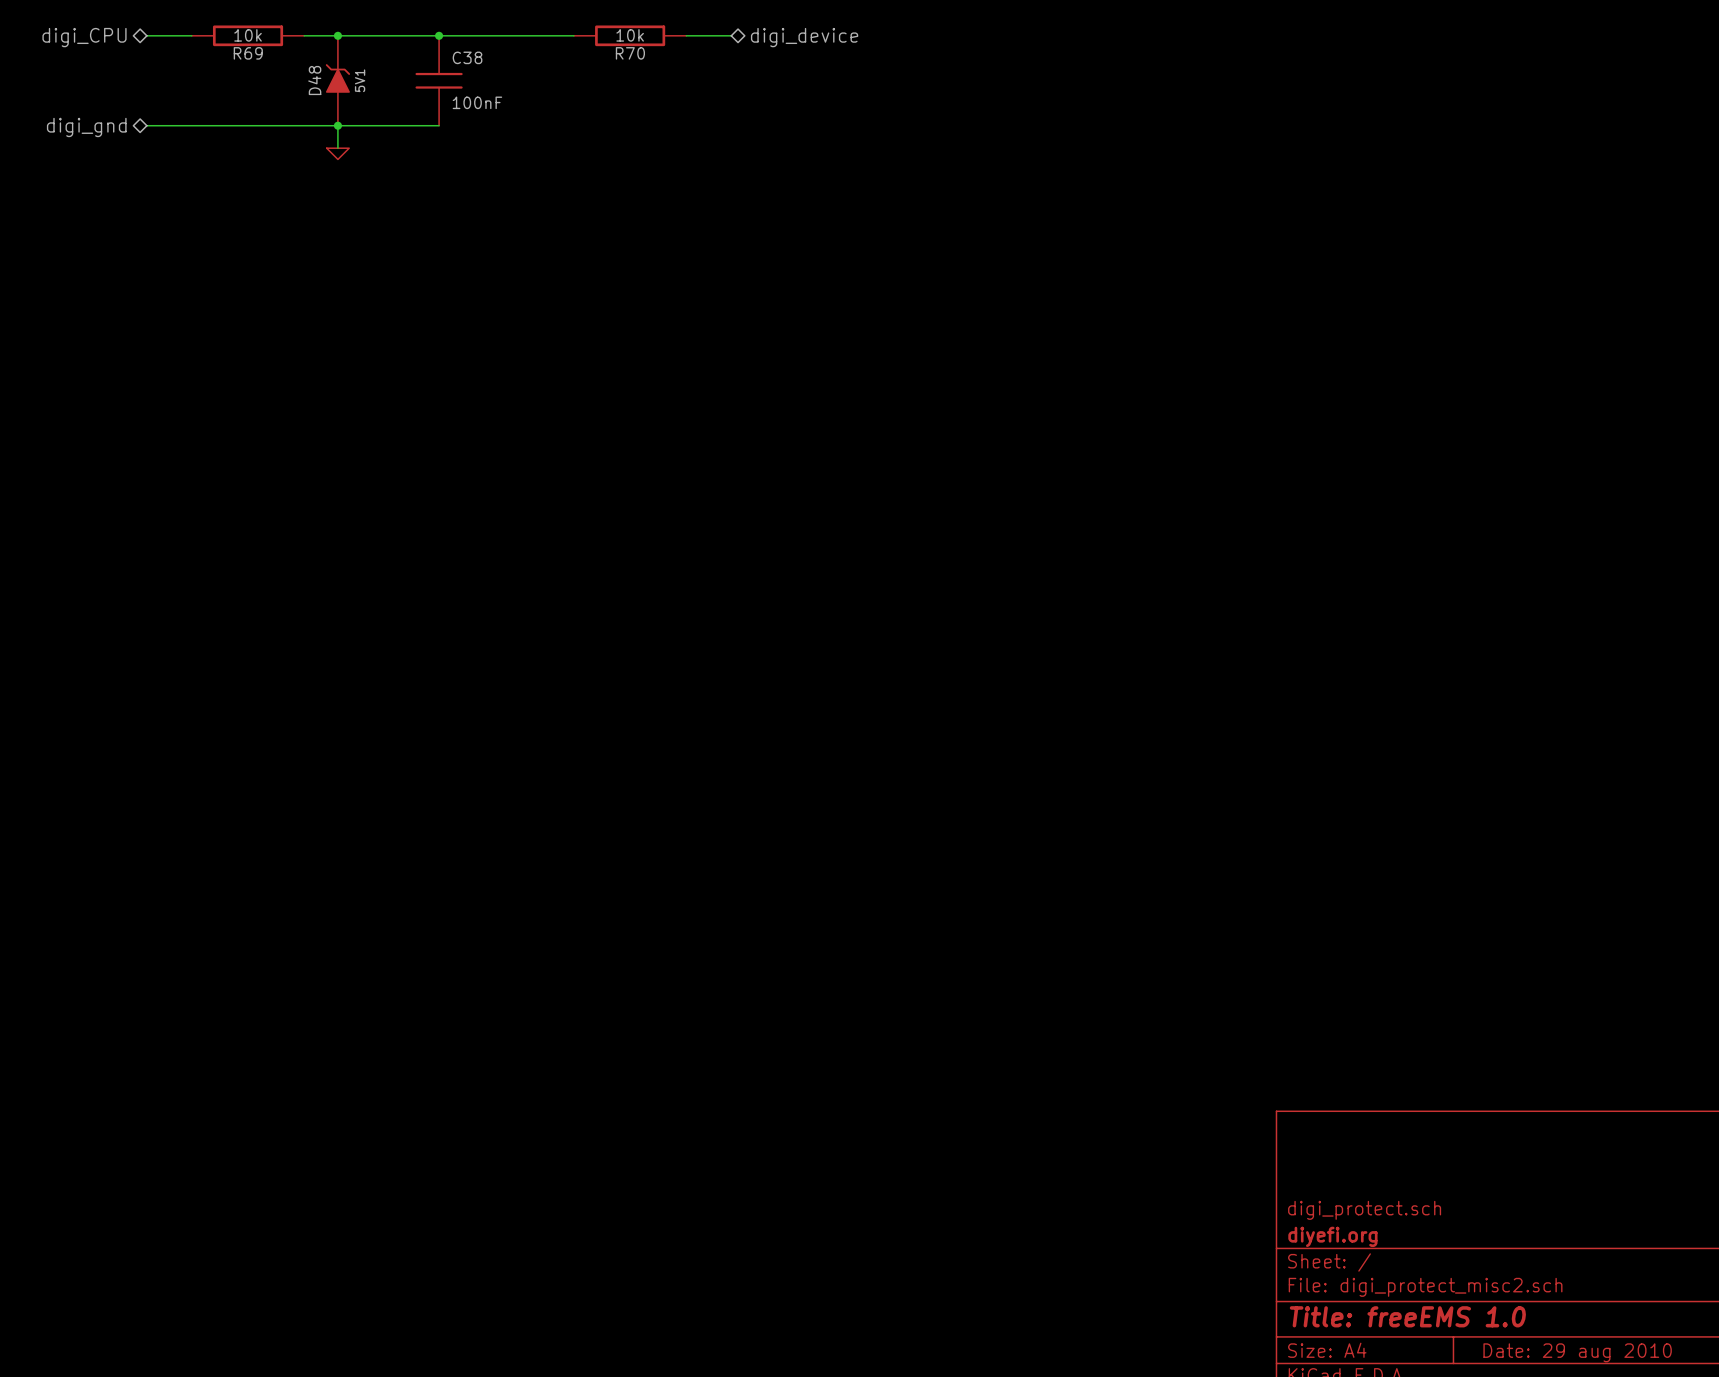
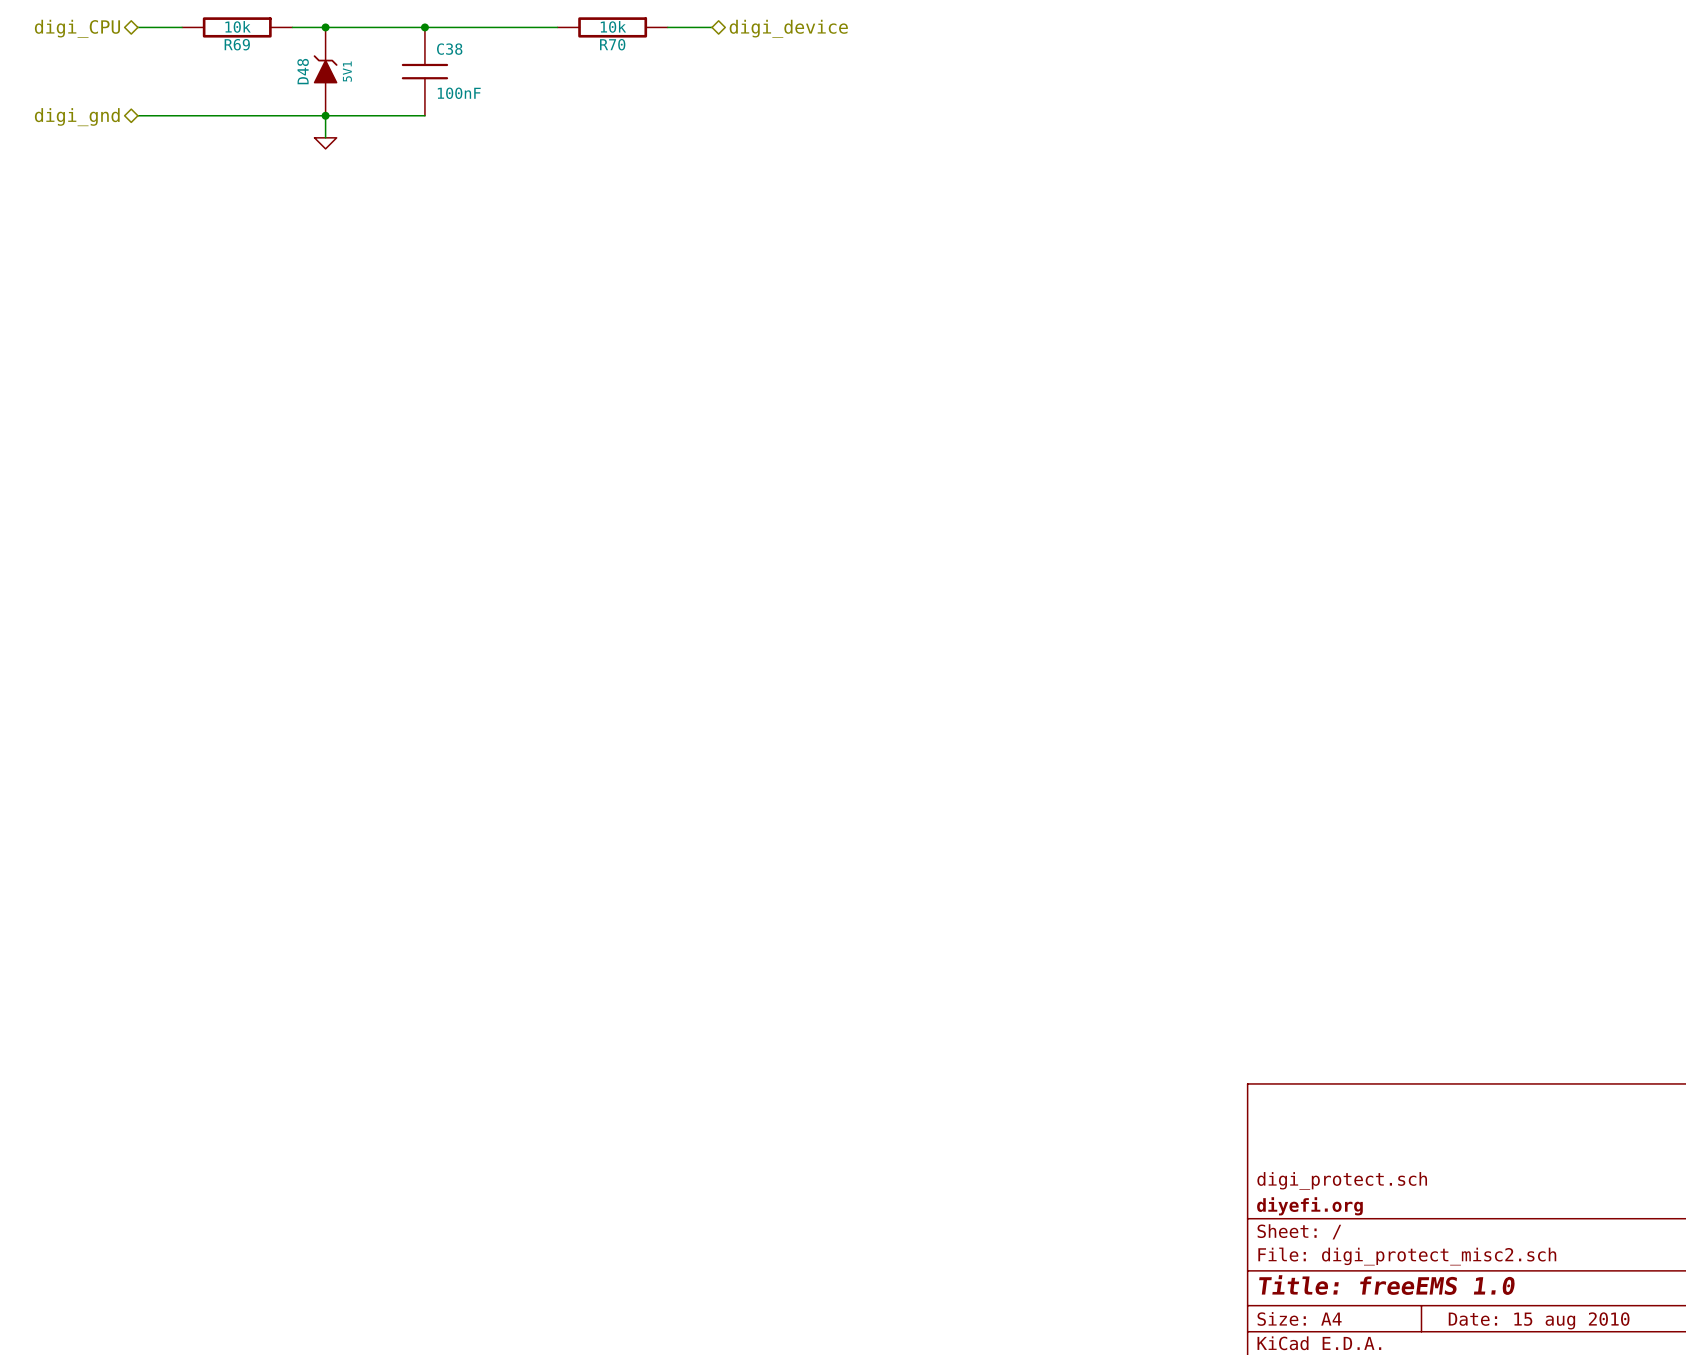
title block: Date: 29 aug 2010 (1577, 1352) -> Date: 15 aug 2010 (1539, 1320)

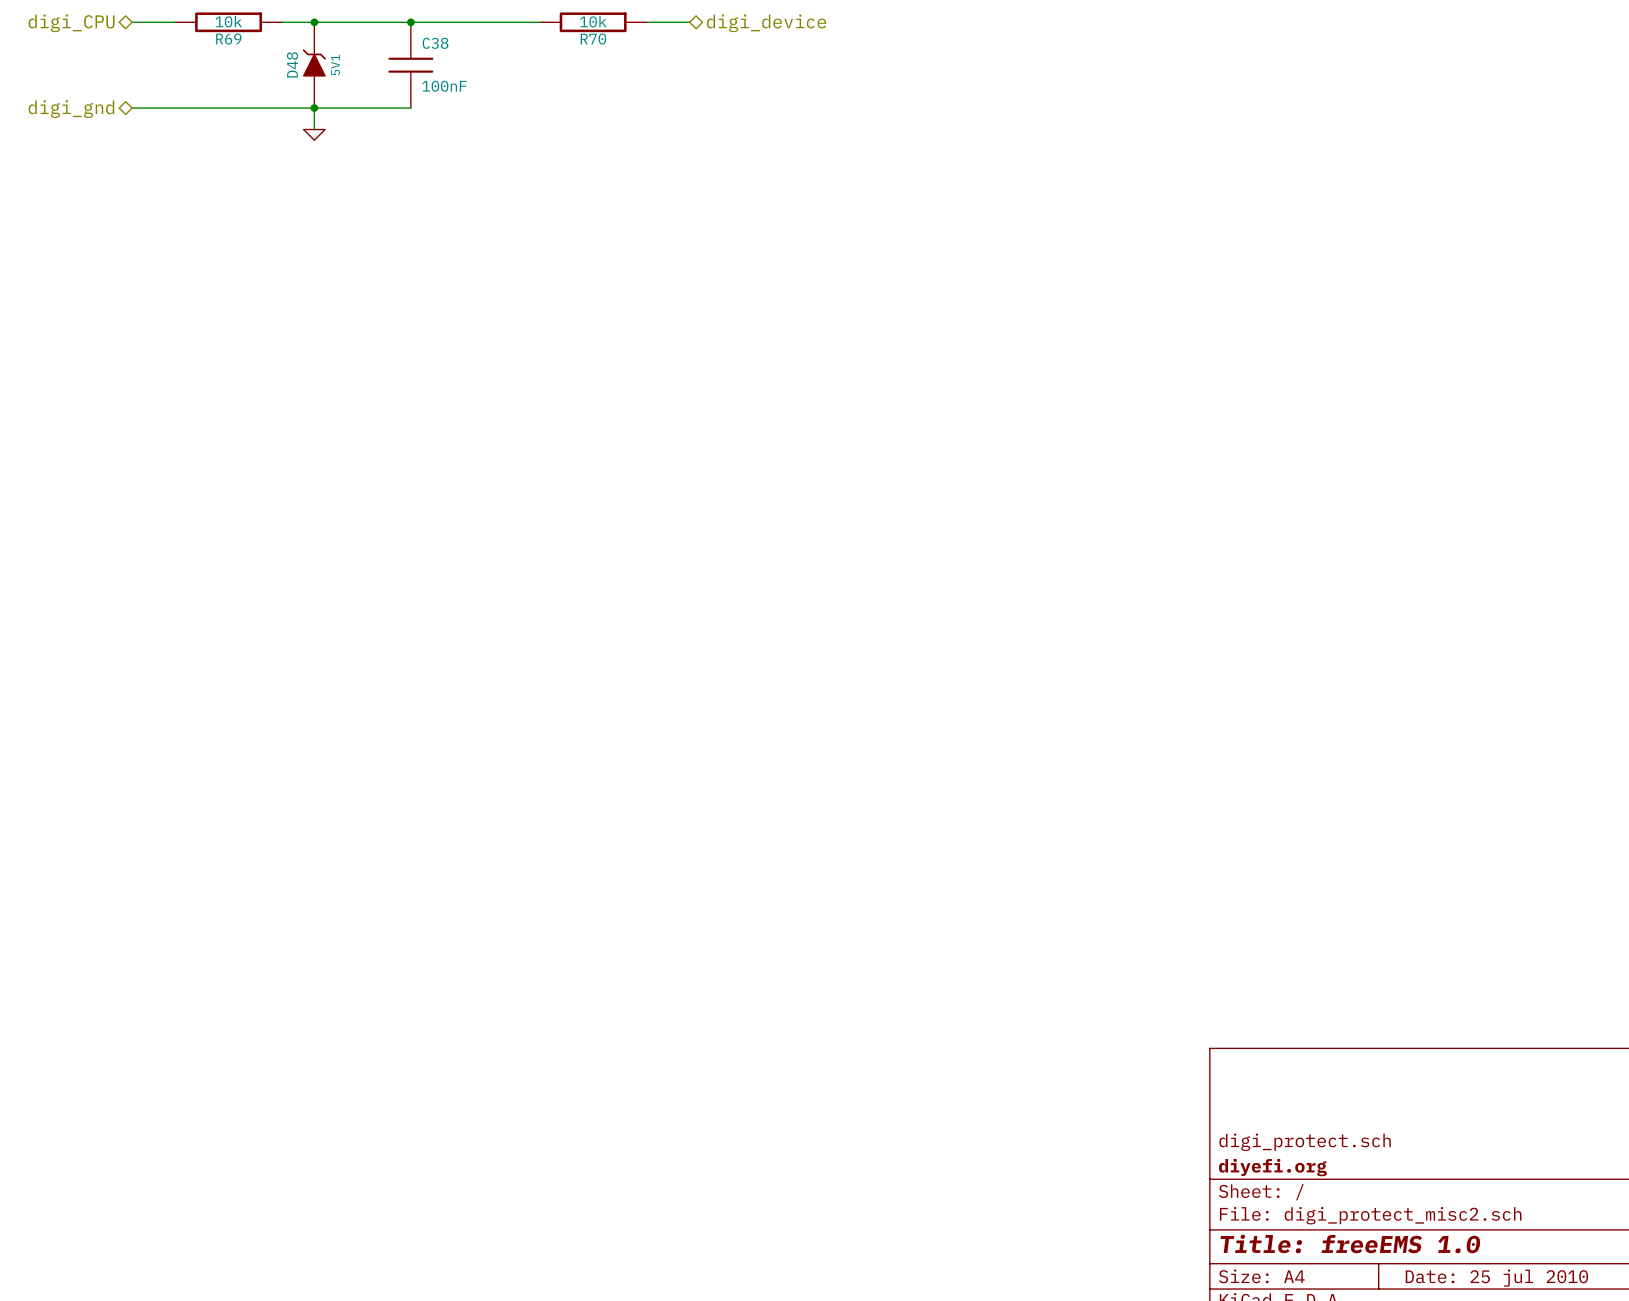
title block: Date: 15 aug 2010 (1539, 1320) -> Date: 25 jul 2010 (1496, 1278)

